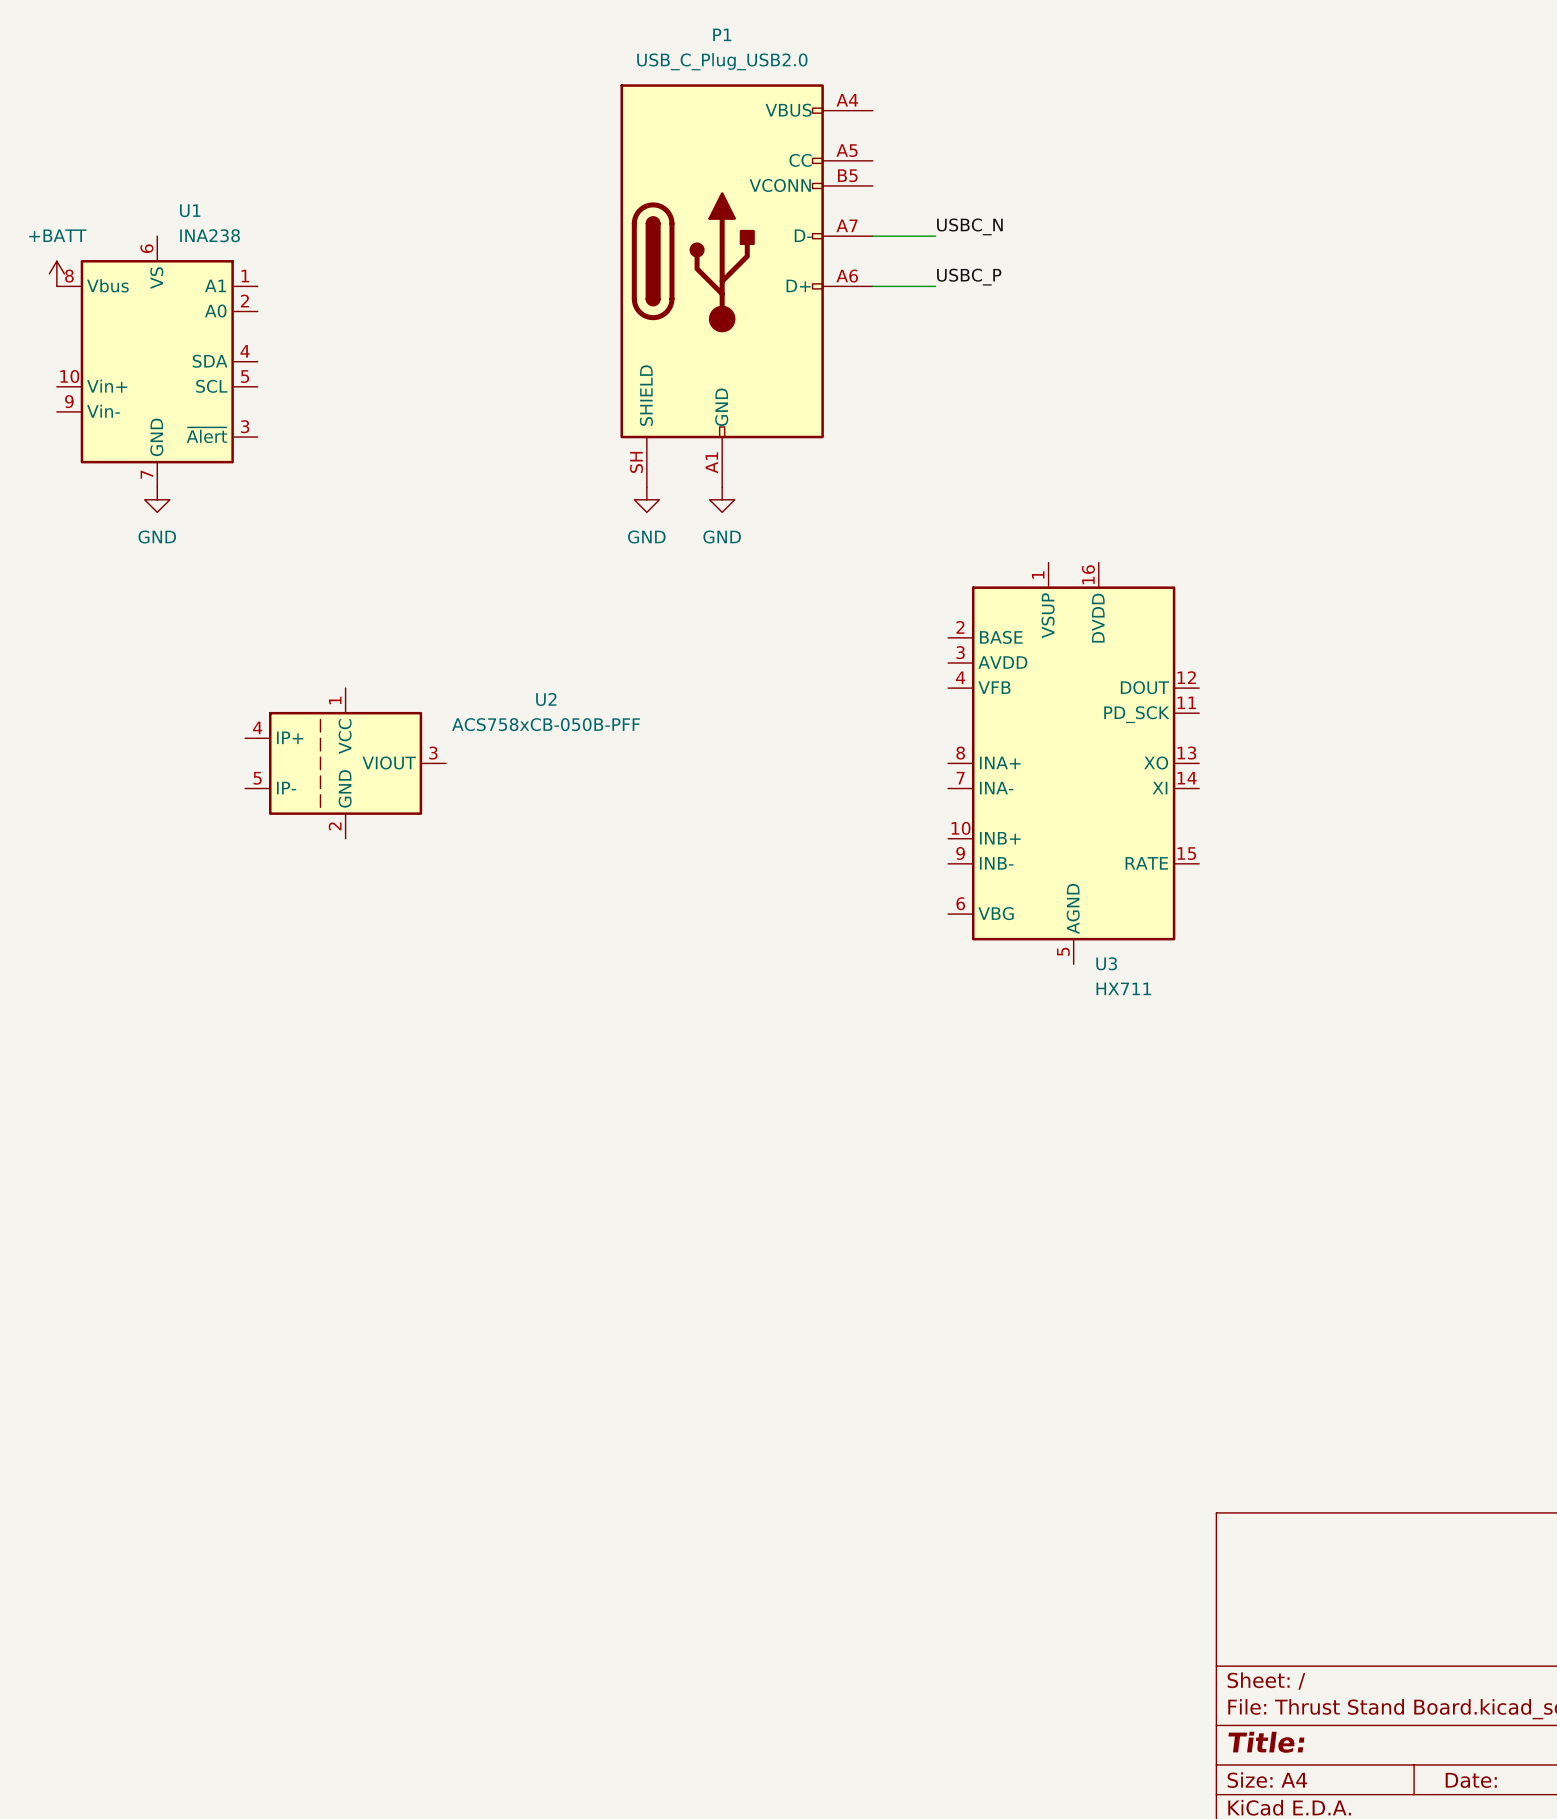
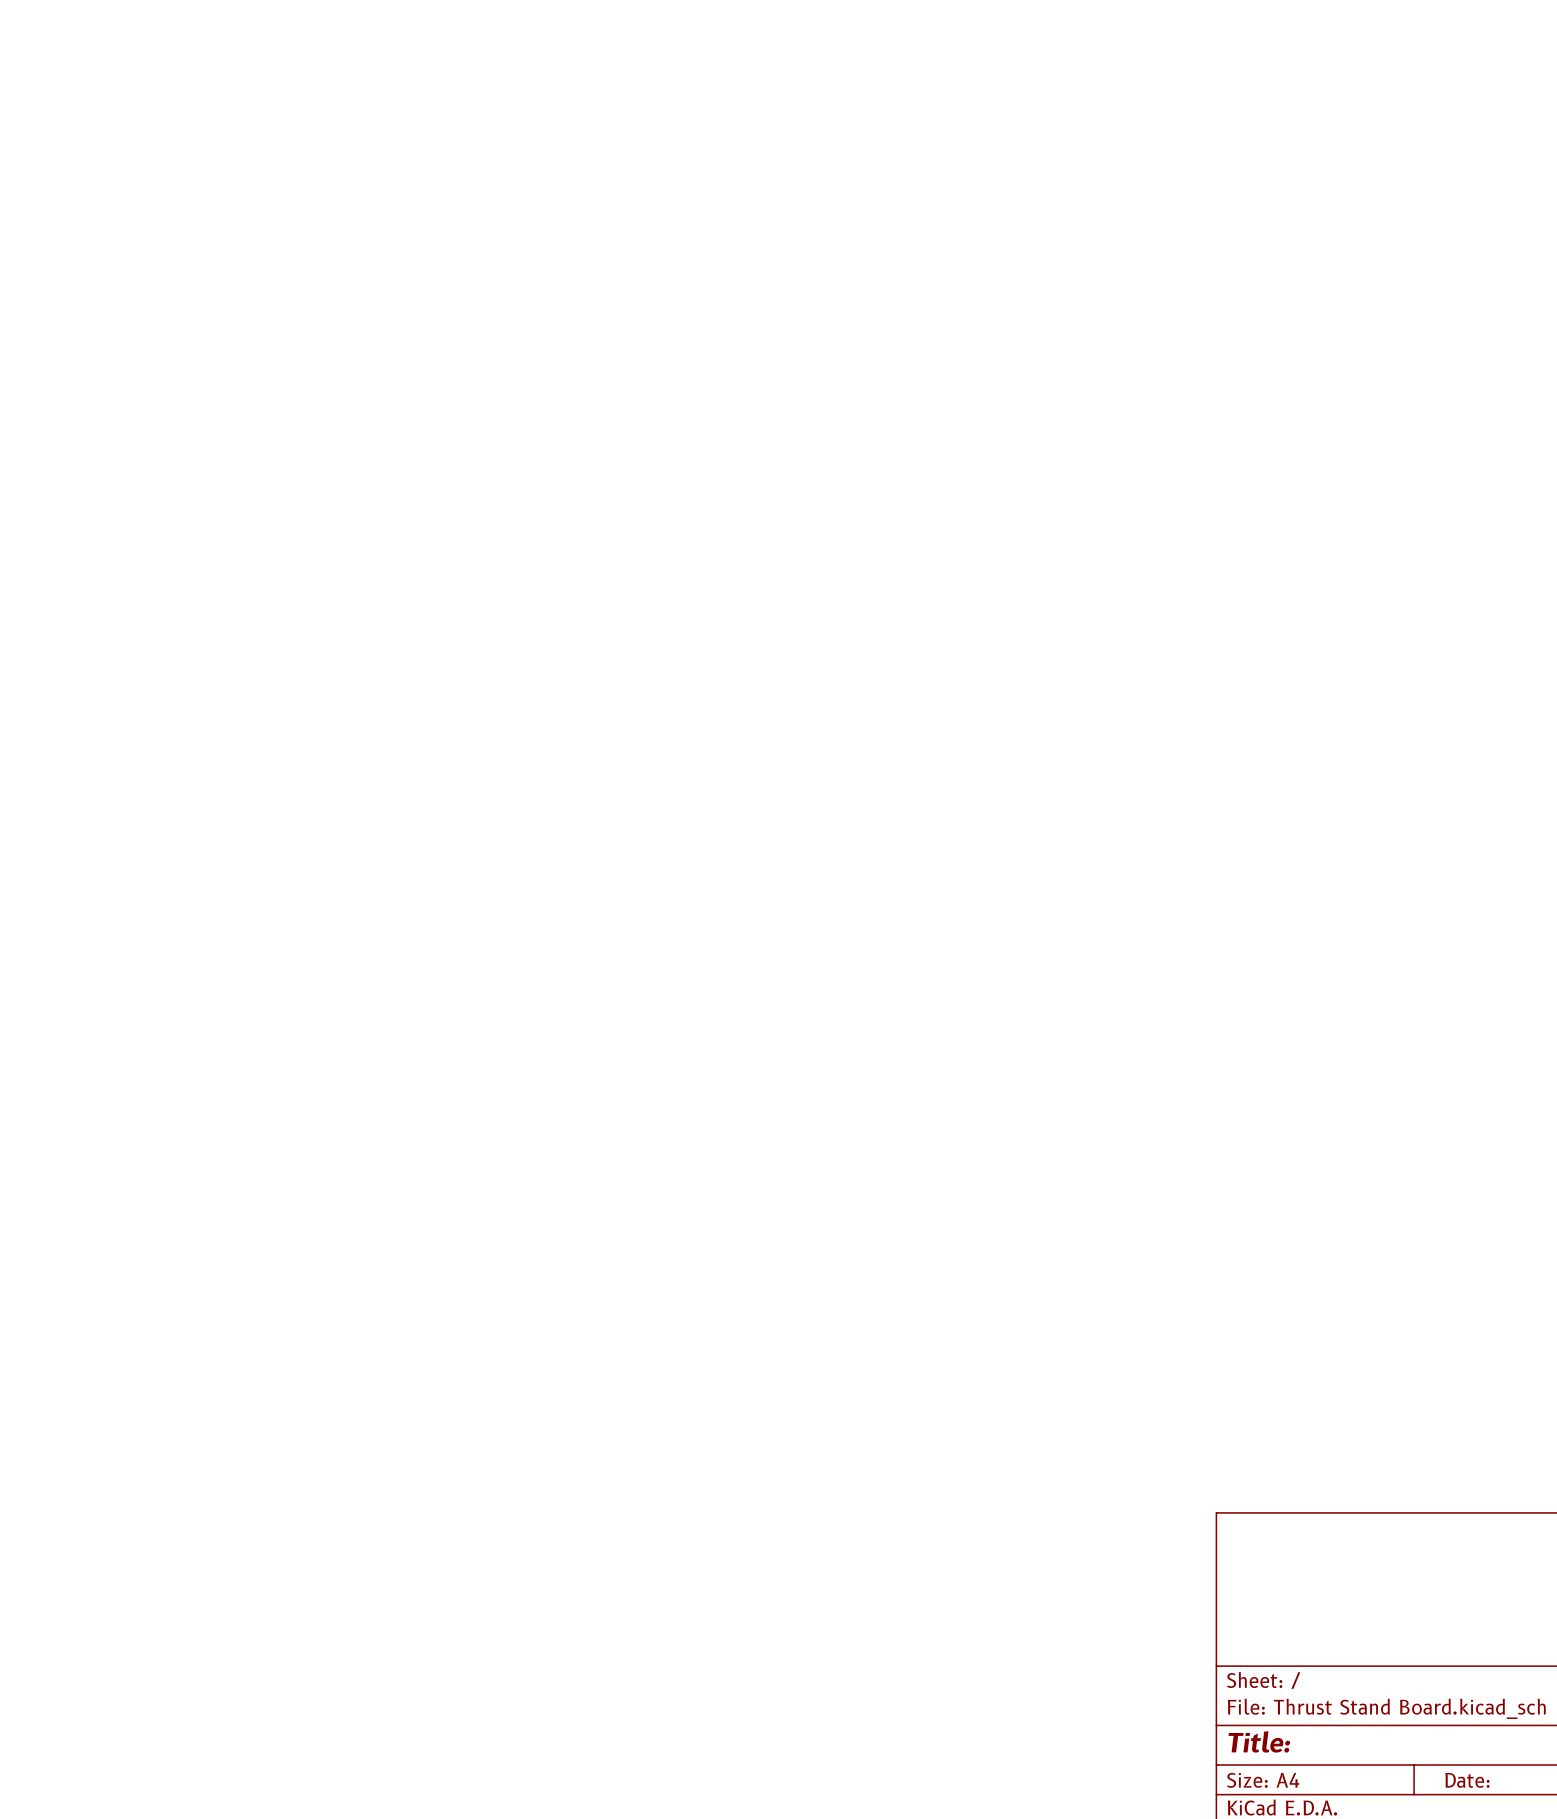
label: USBC_N (969, 226) -> none
wire: (872, 236) (935, 236) -> none
power symbol: +BATT (56, 273) -> none
label: USBC_P (969, 277) -> none
P1: USB_C_Plug_USB2.0 (746, 285) -> none
wire: (872, 286) (935, 286) -> none
U1: INA238 (157, 361) -> none
power symbol: GND (157, 499) -> none
power symbol: GND (646, 499) -> none
power symbol: GND (722, 499) -> none
U2: ACS758xCB-050B-PFF (345, 763) -> none
U3: HX711 (1073, 763) -> none

